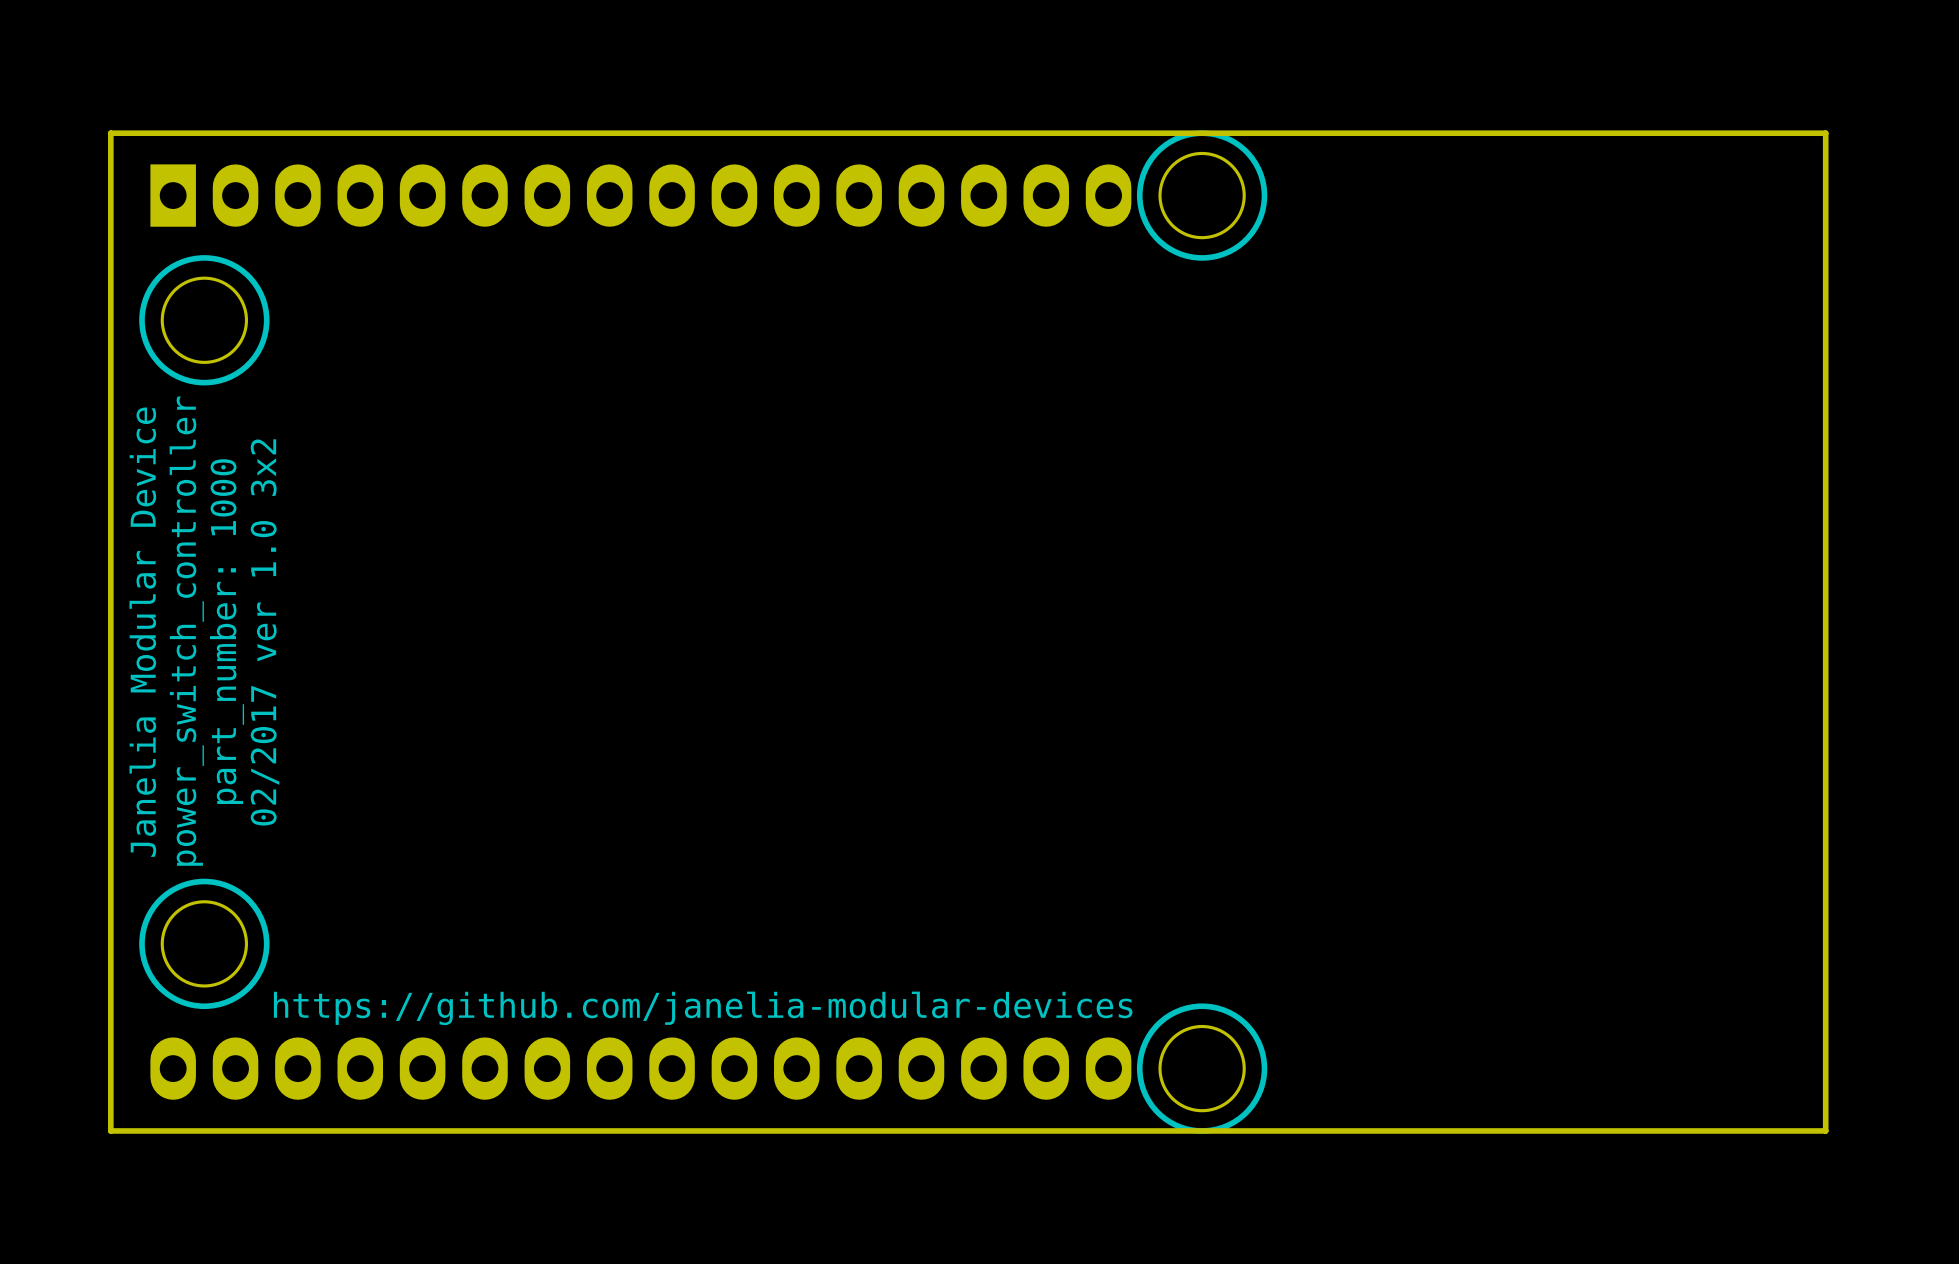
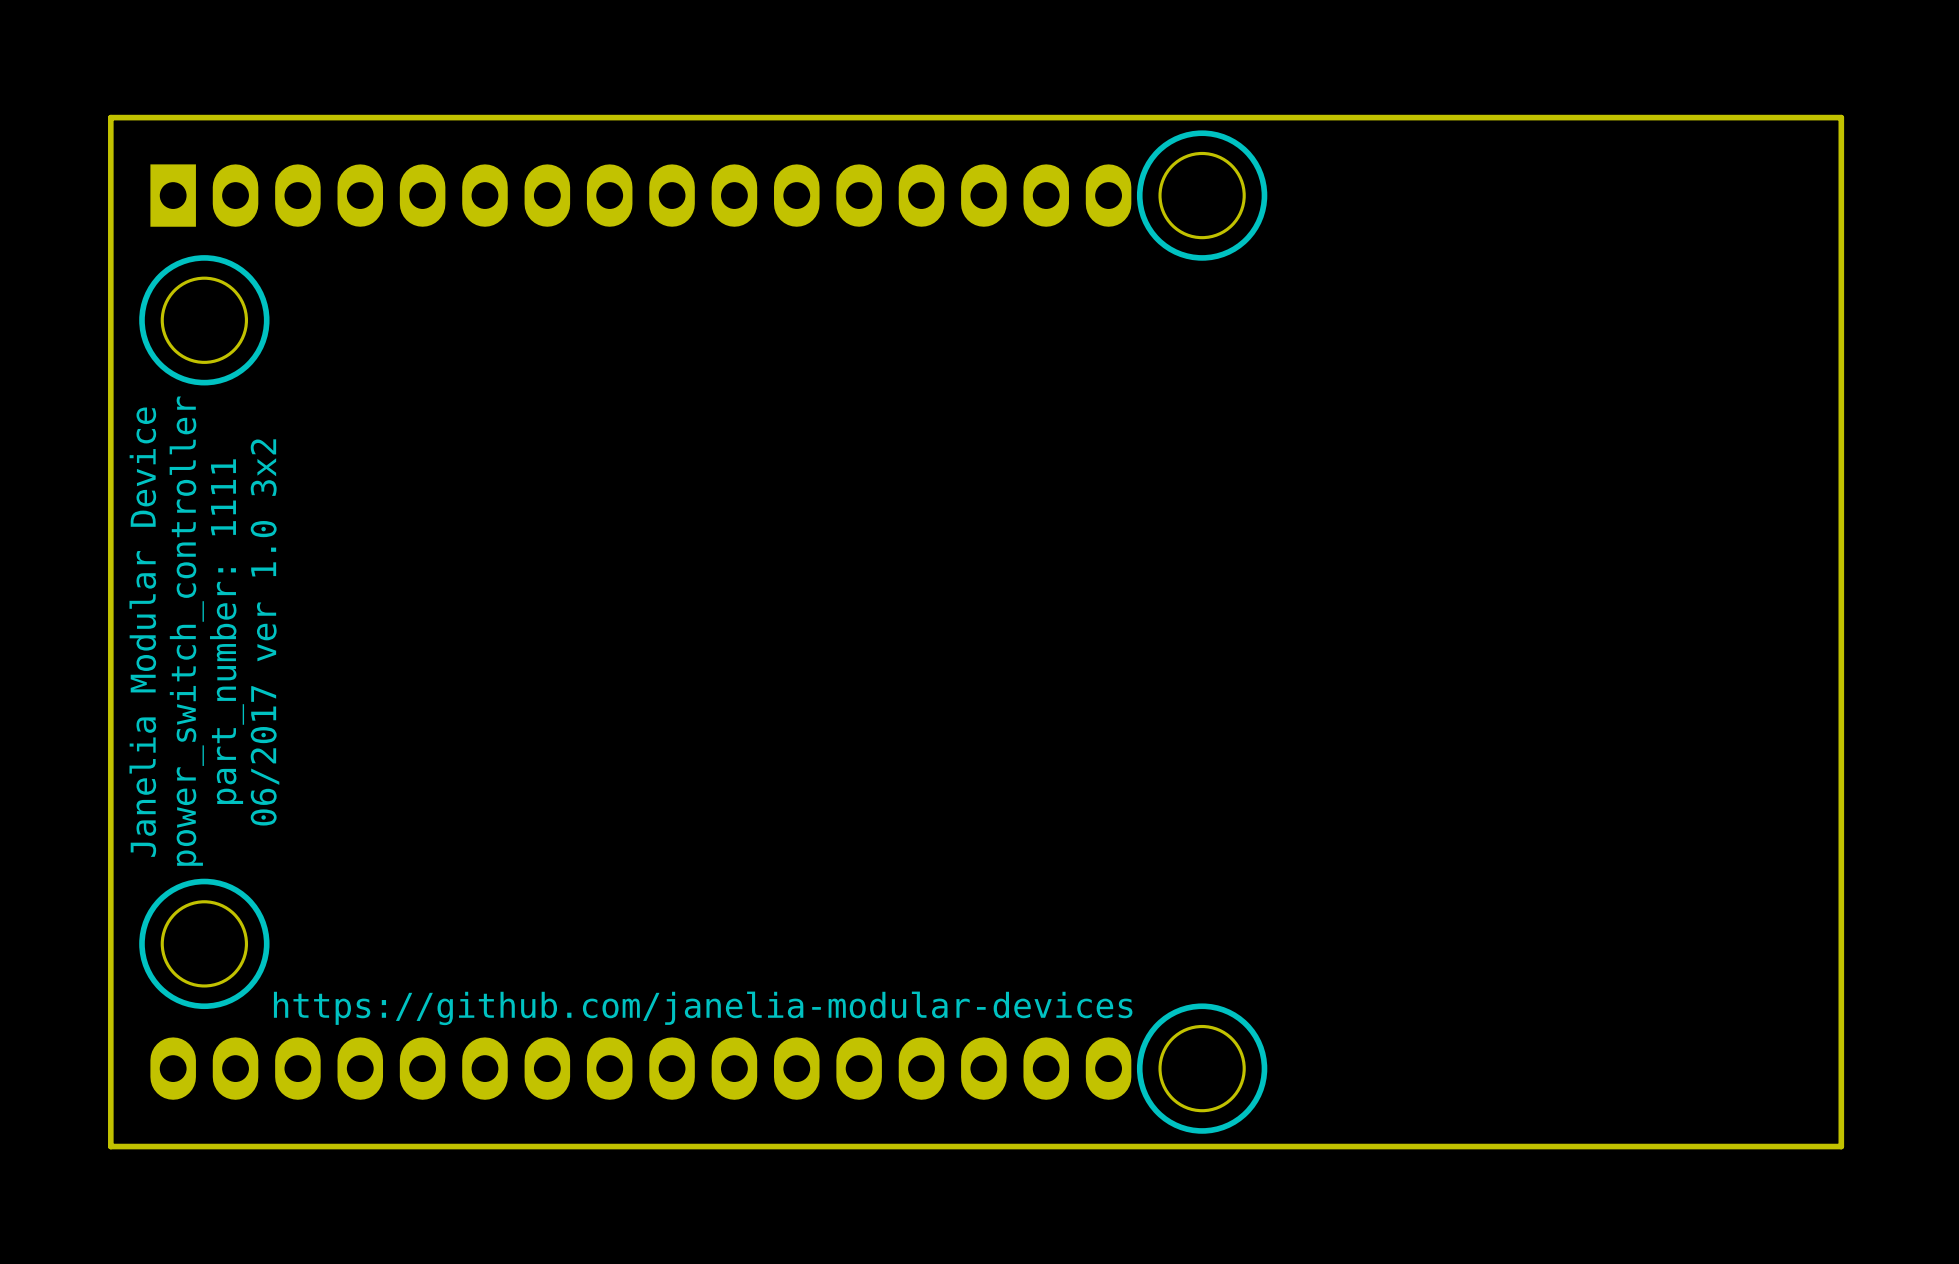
board edge: (110, 133) (1825, 133) (1825, 1130) (110, 1130) -> (110, 133) (110, 117) (1841, 117) (1841, 1146) (110, 1146) (110, 1130)
text: part_number: 1000 (227, 631) -> part_number: 1111 (227, 631)
text: 02/2017 ver 1.0 3x2 (265, 632) -> 06/2017 ver 1.0 3x2 (265, 632)

